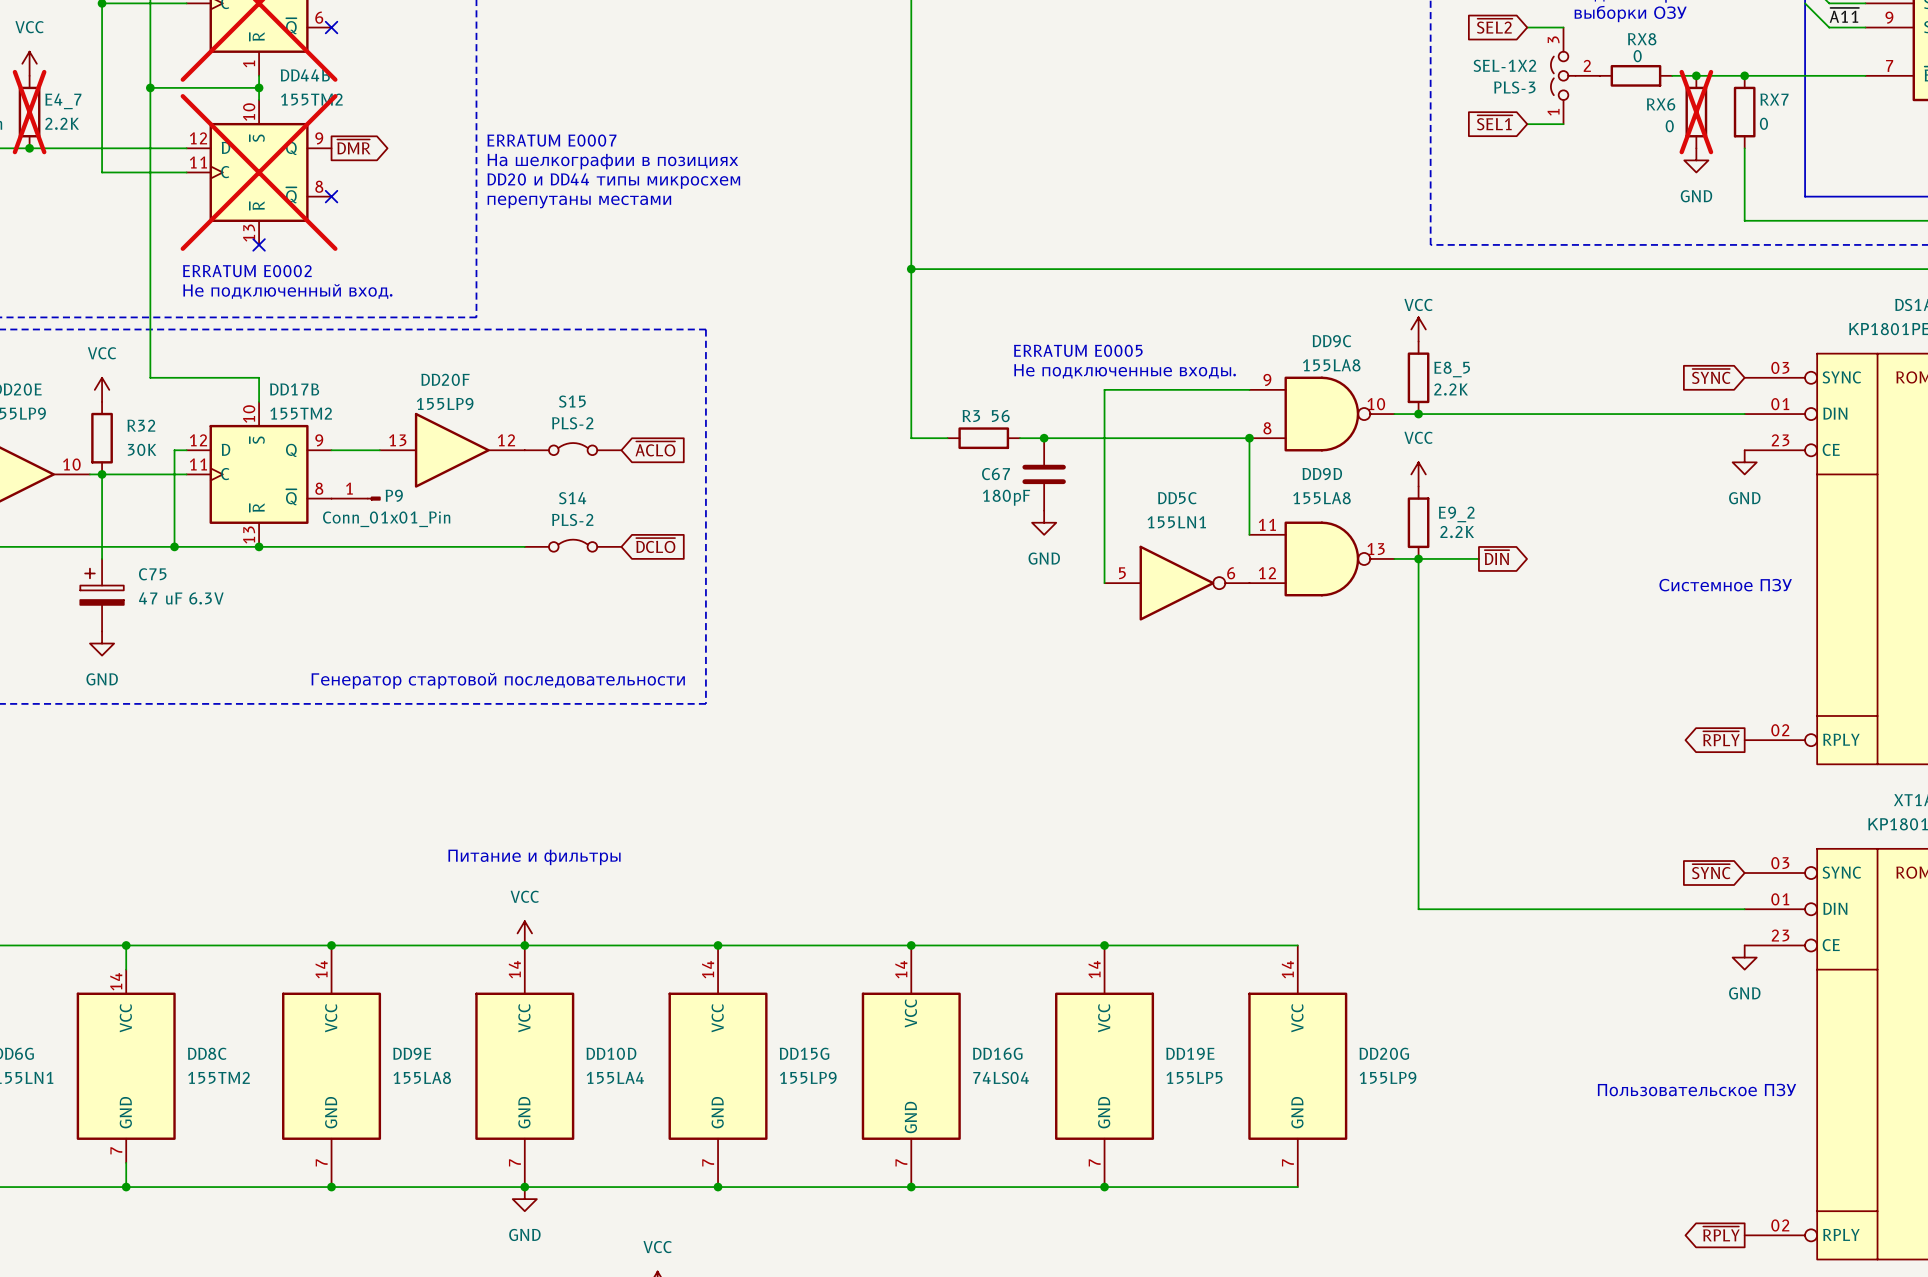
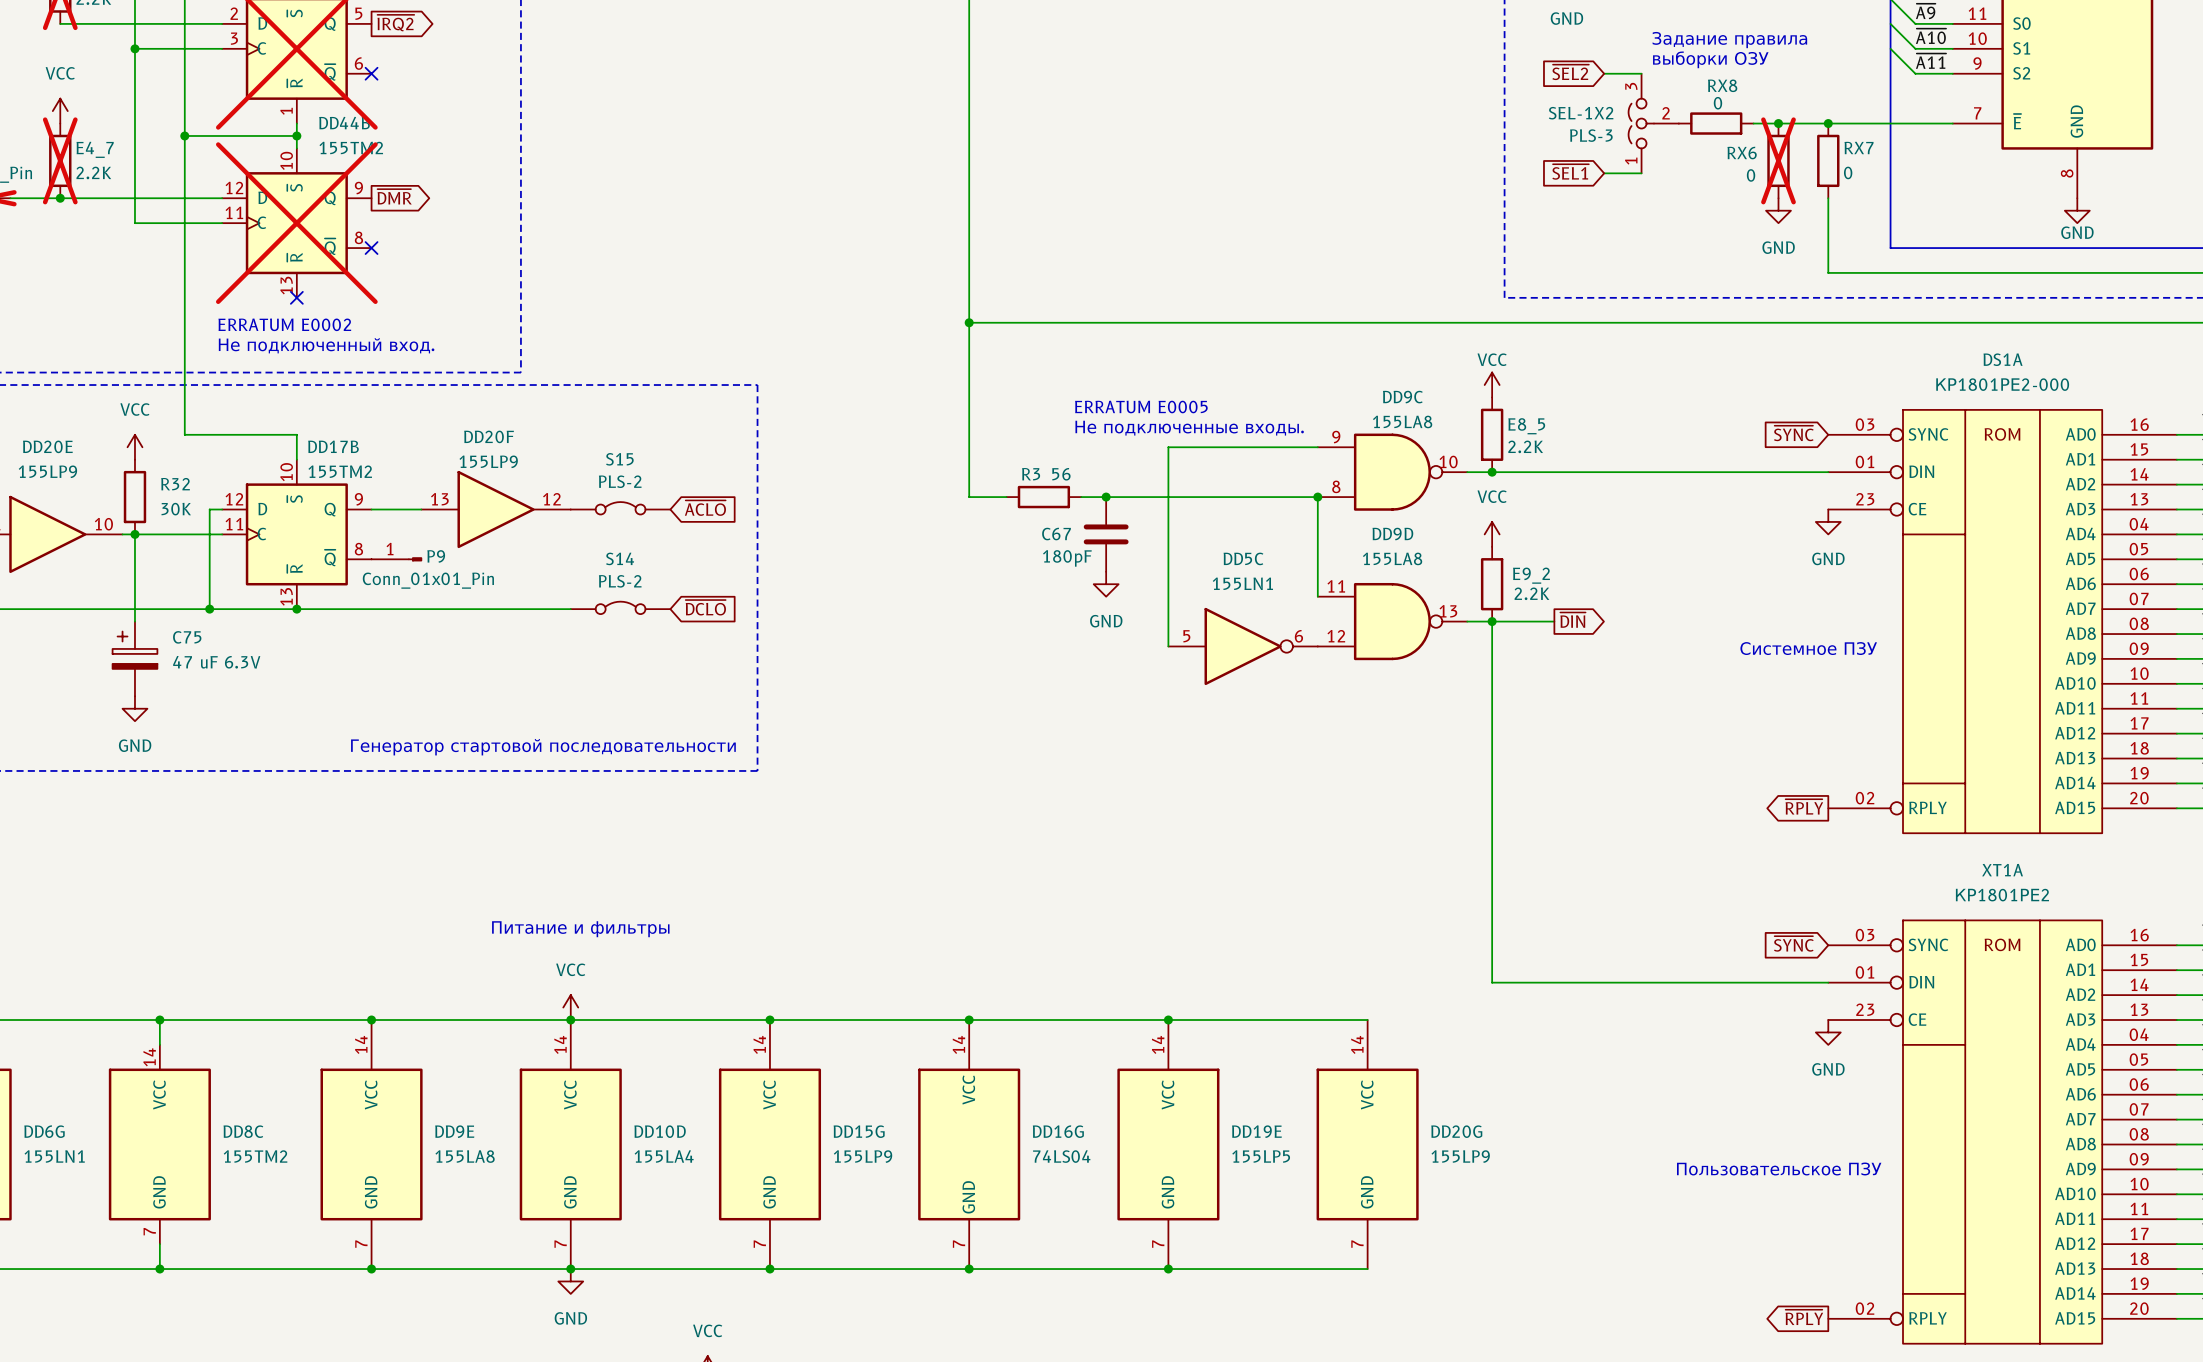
text: ERRATUM E0007 (551, 140) -> none
text: На шелкографии в позициях (612, 161) -> none
text: DD20 и DD44 типы микросхем (613, 181) -> none
text: перепутаны местами (579, 201) -> none

